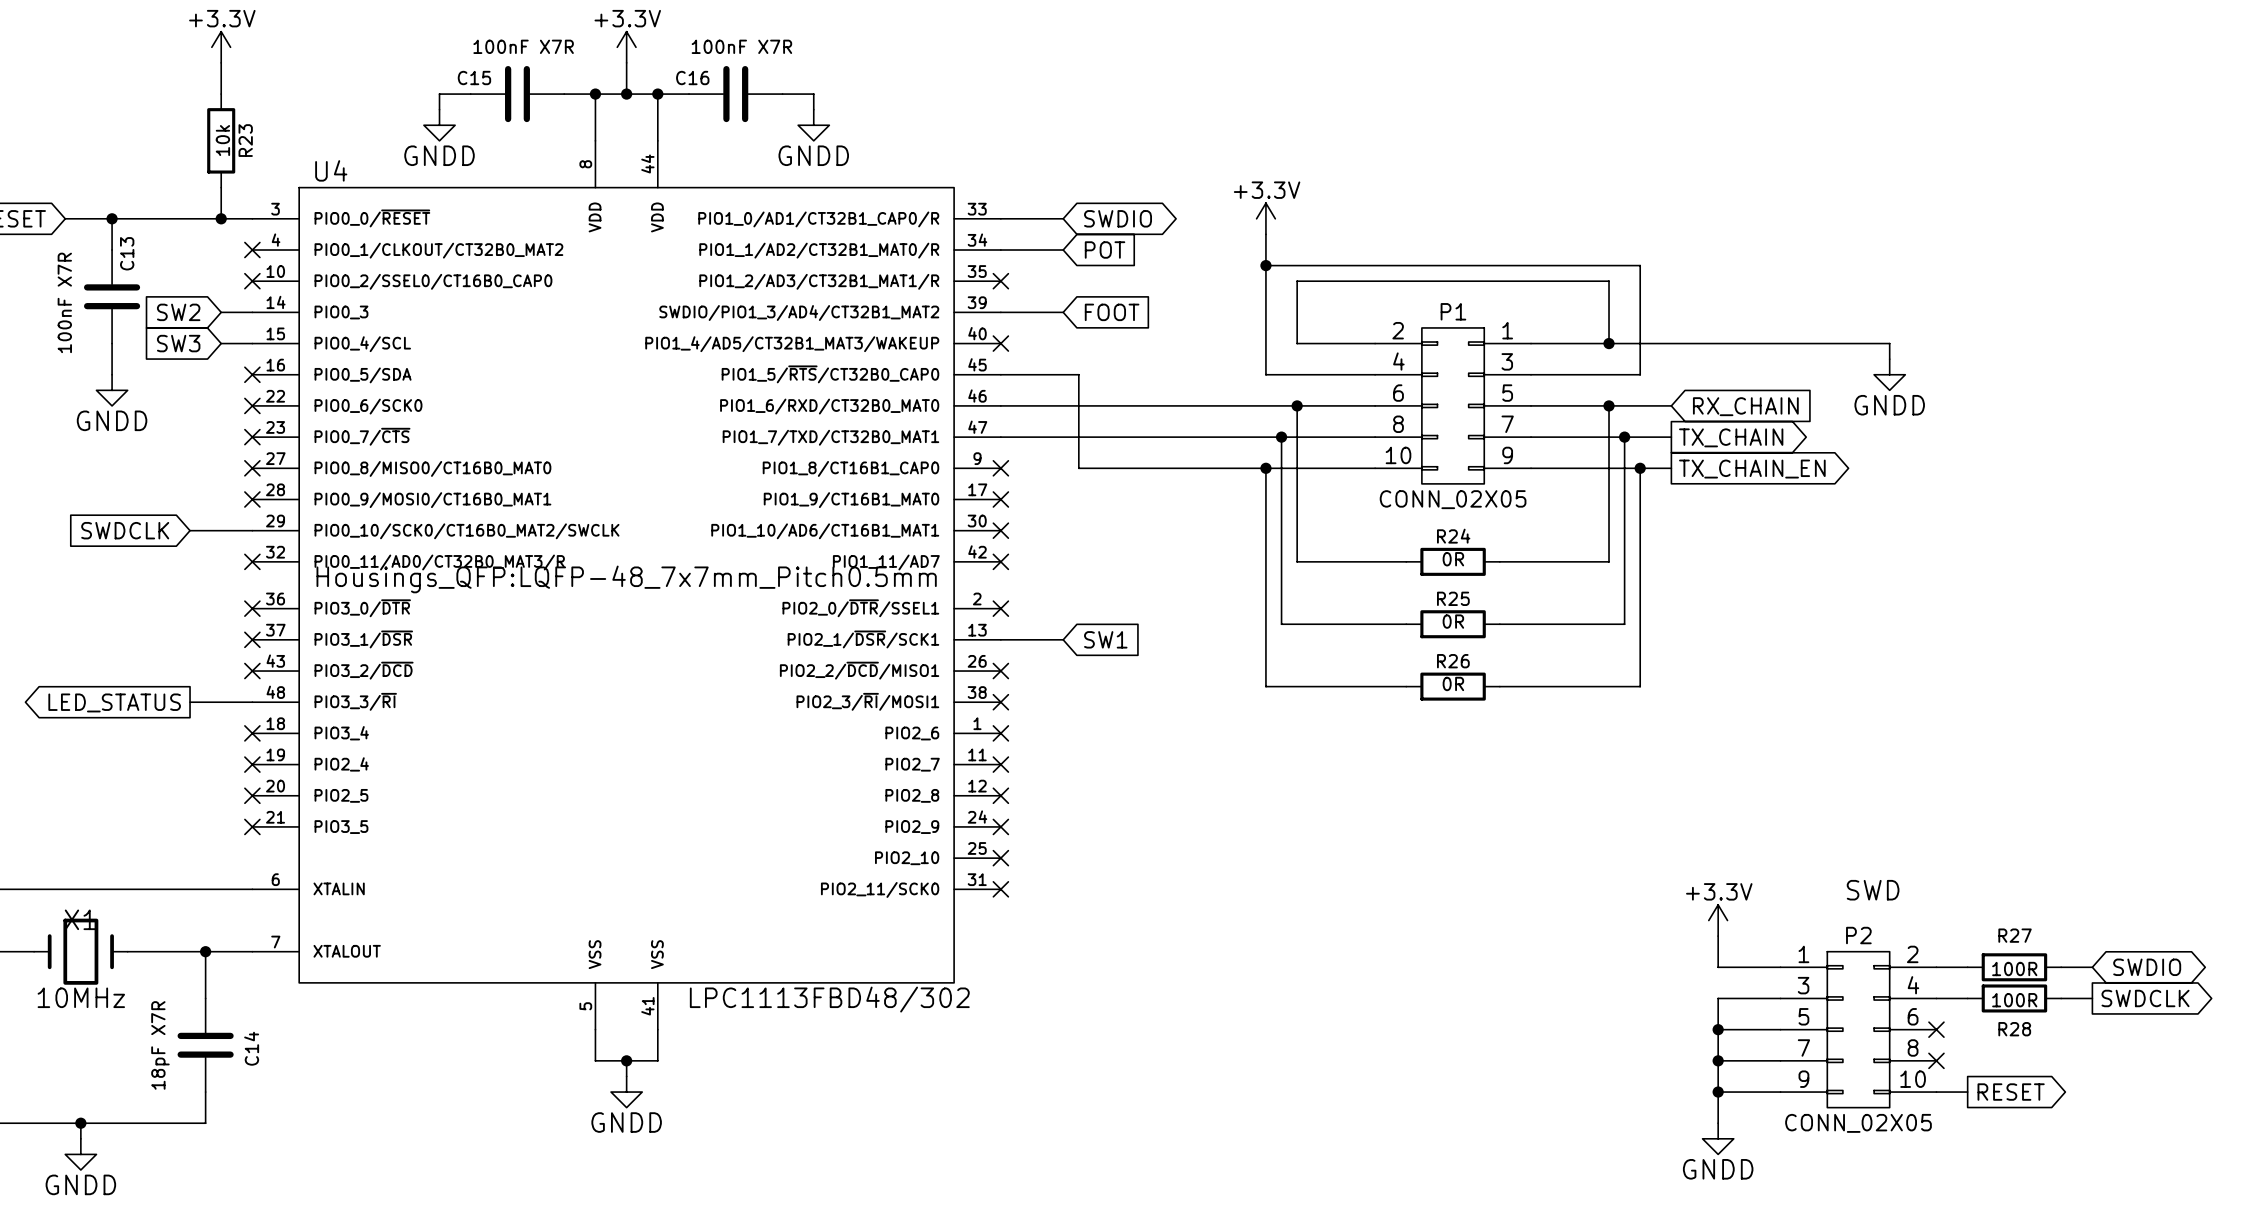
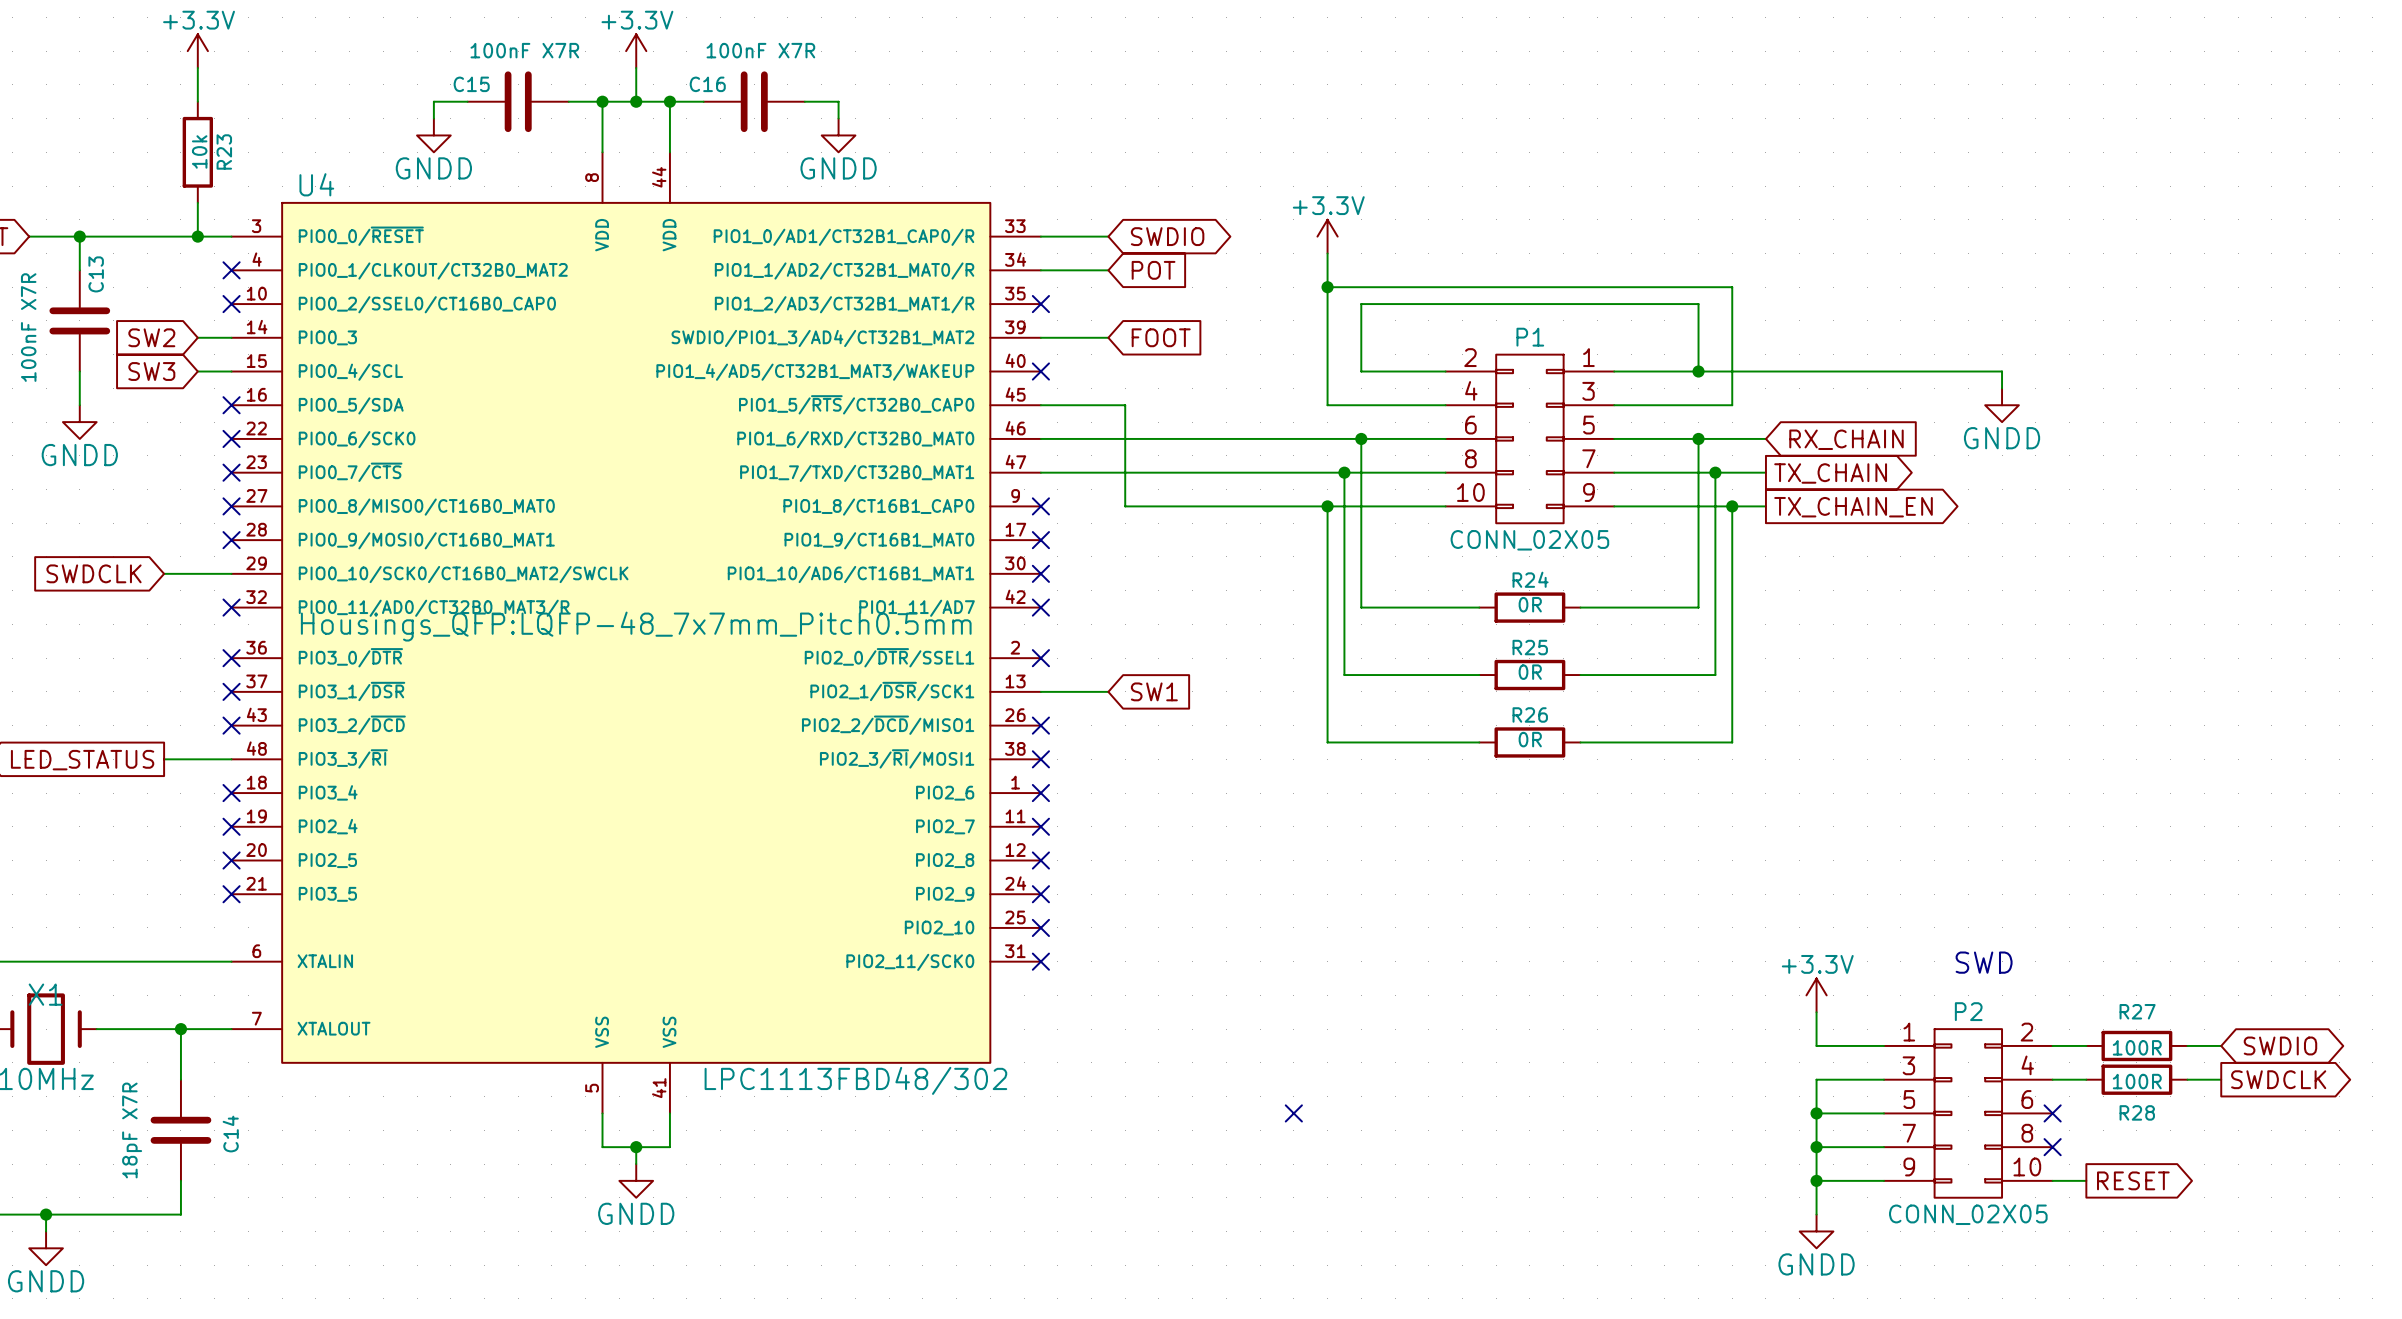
no-connect mark: none -> (1293, 1113)

